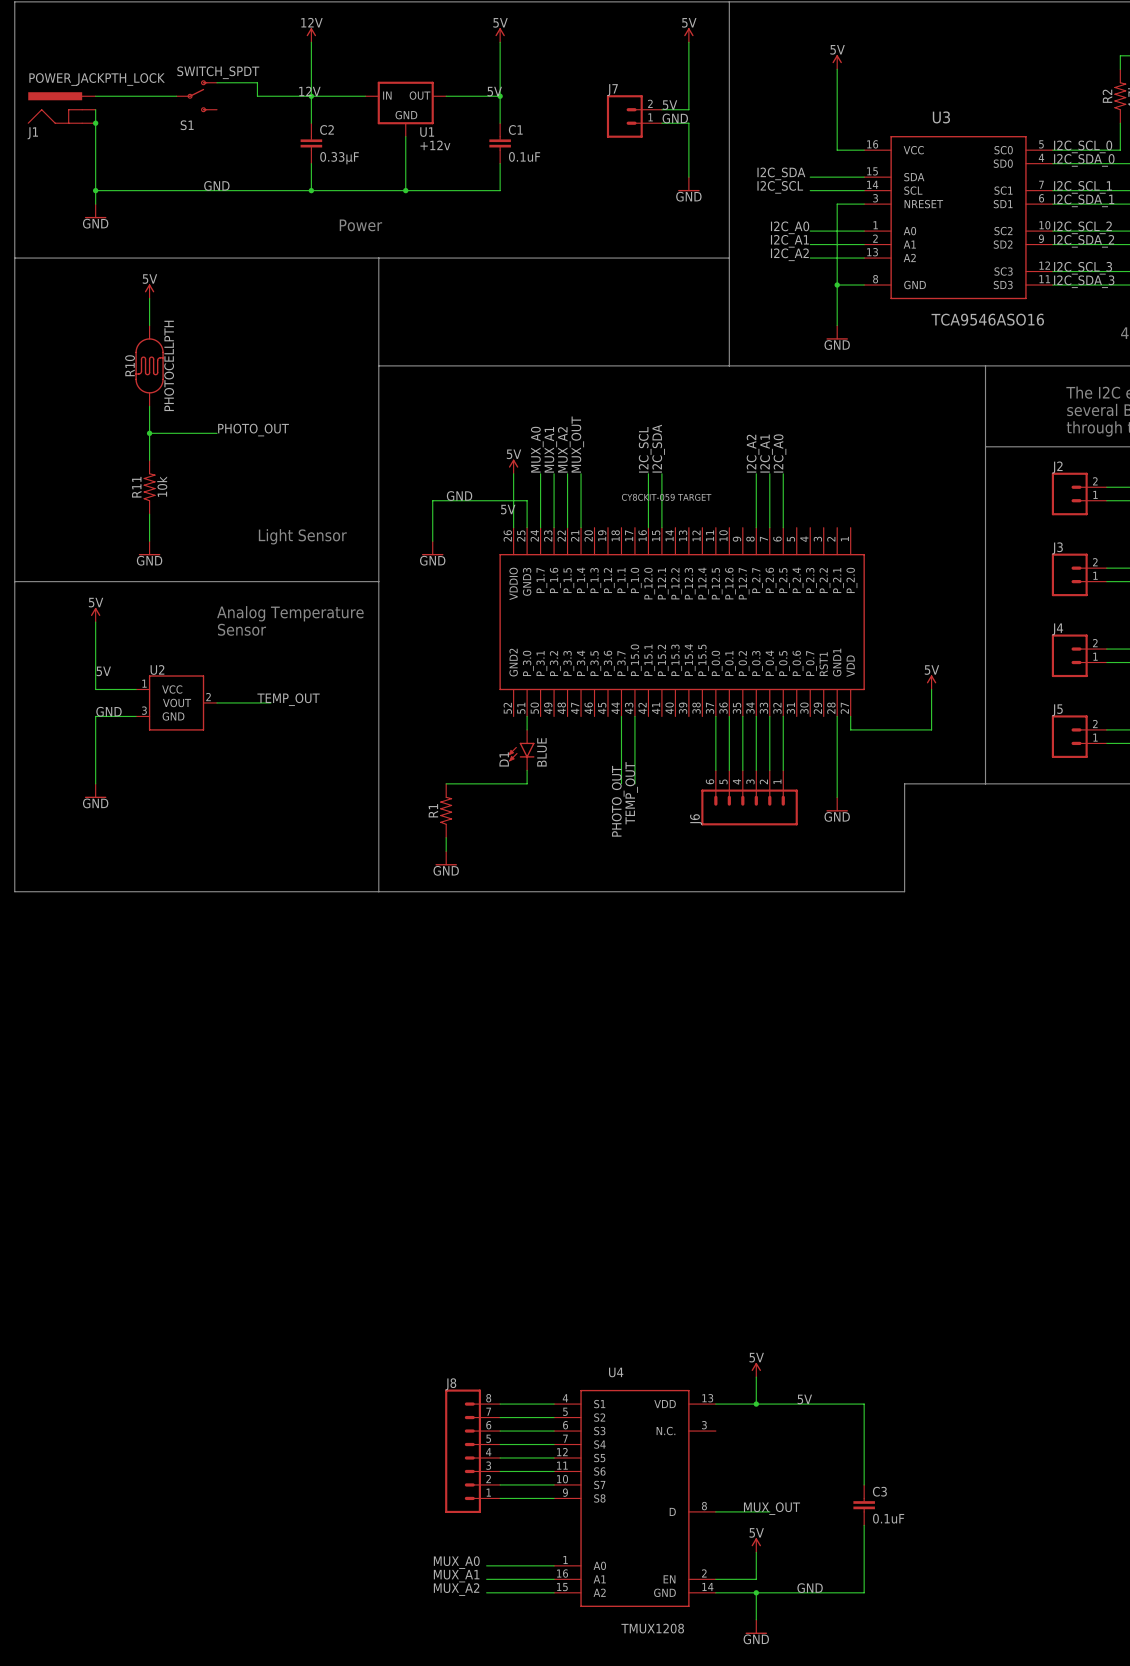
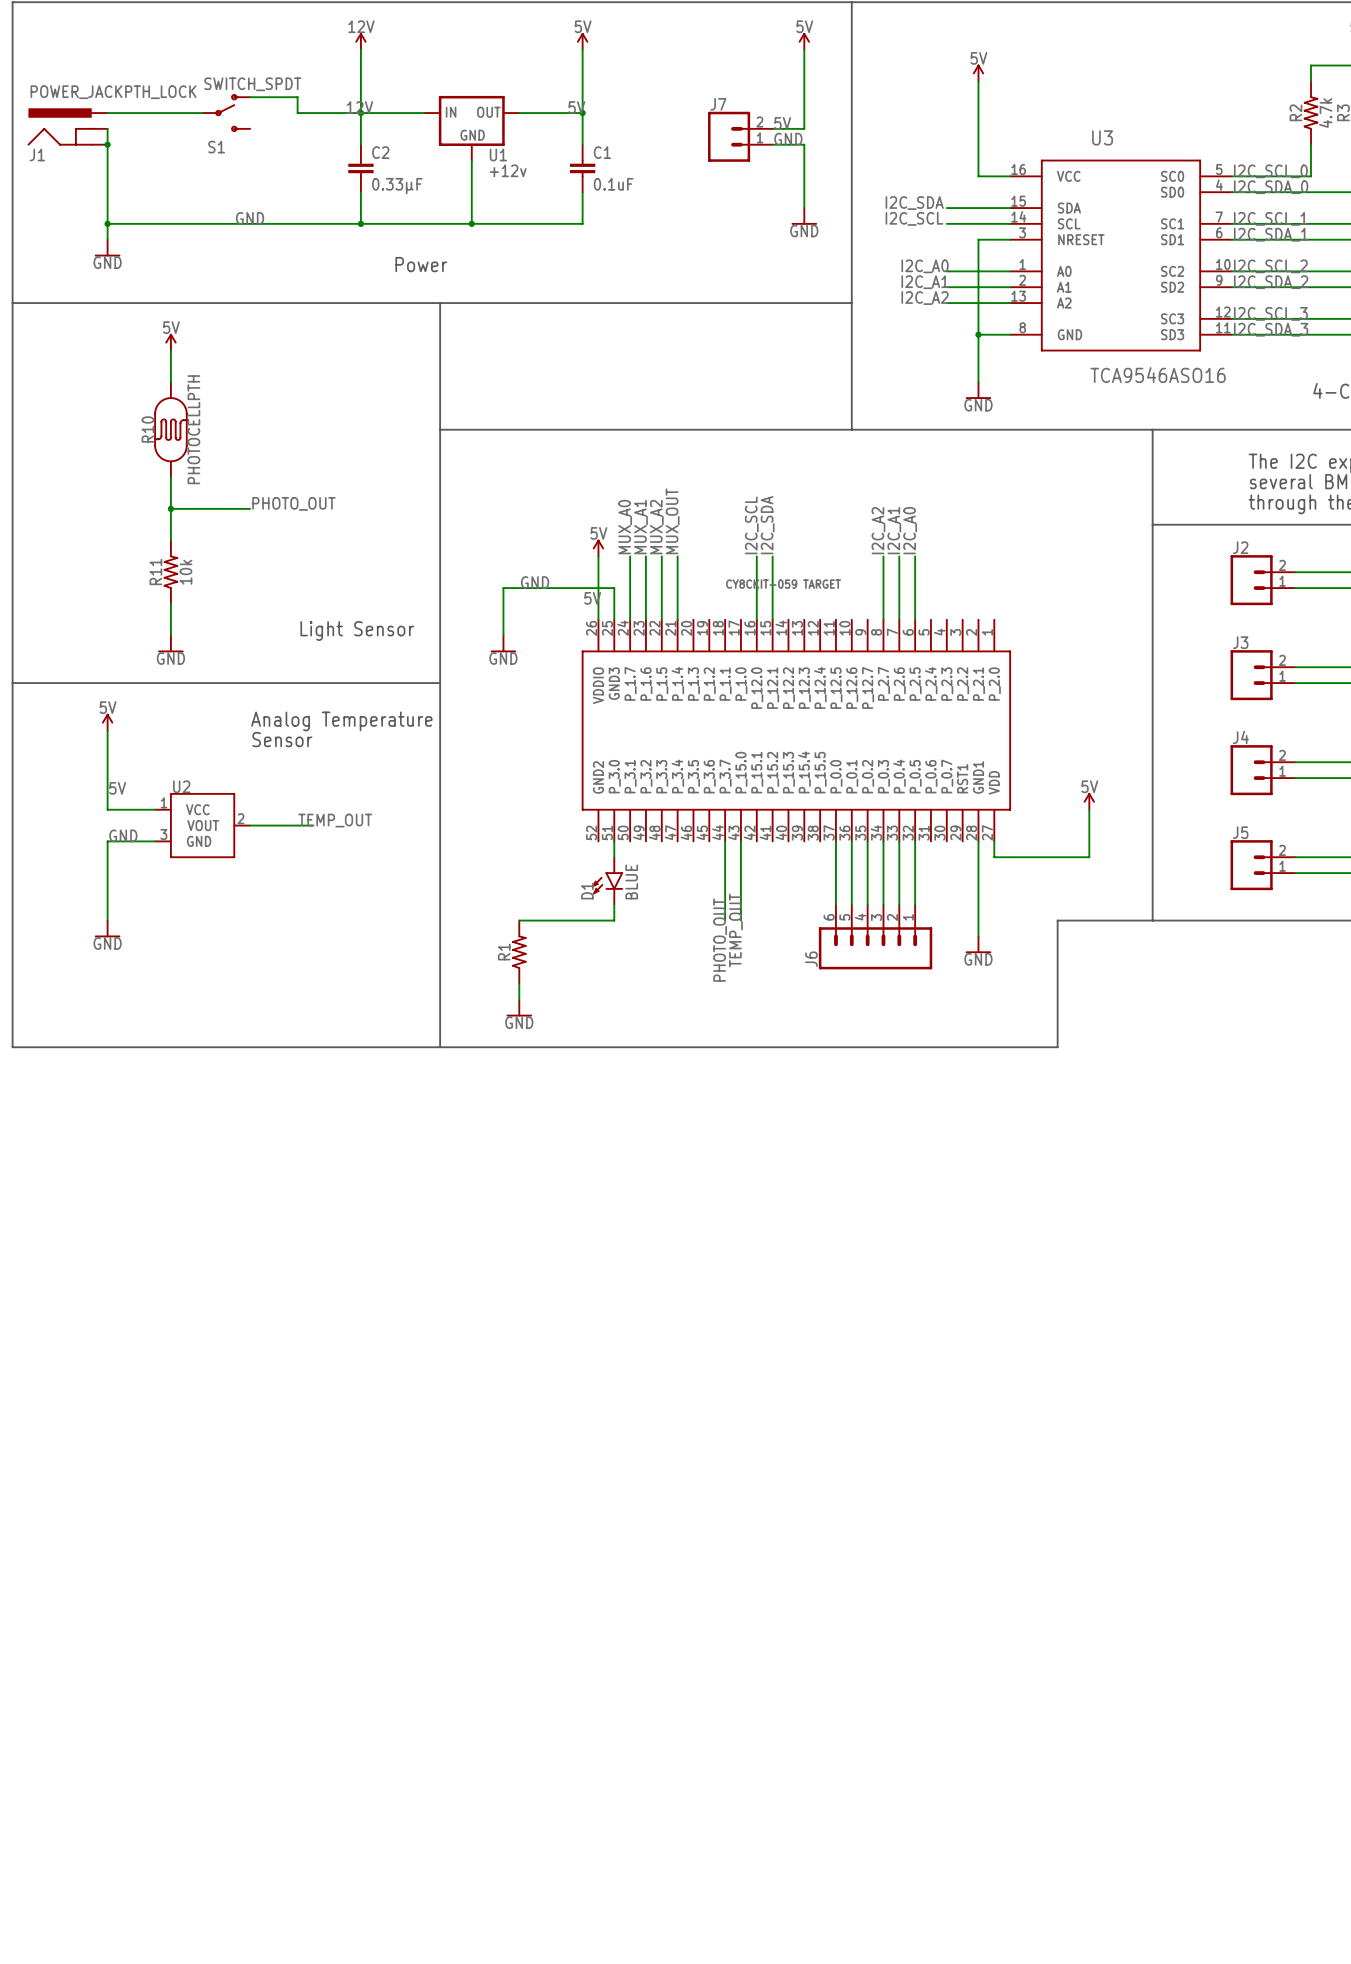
power symbol: 5V (756, 1370) -> none
wire: (756, 1377) (756, 1404) -> none
label: 5V (804, 1399) -> none
wire: (500, 1404) (554, 1404) -> none
wire: (715, 1404) (864, 1404) (864, 1484) -> none
junction: (756, 1404) -> none
wire: (500, 1417) (554, 1417) -> none
wire: (500, 1431) (554, 1431) -> none
wire: (500, 1444) (554, 1444) -> none
J8: (472, 1451) -> none
wire: (500, 1458) (554, 1458) -> none
wire: (500, 1471) (554, 1471) -> none
wire: (500, 1484) (554, 1484) -> none
wire: (500, 1498) (554, 1498) -> none
U4: TMUX1208 (634, 1498) -> none
C3: 0.1uF (864, 1505) -> none
label: MUX_OUT (772, 1508) -> none
wire: (715, 1511) (769, 1511) -> none
wire: (864, 1525) (864, 1592) (715, 1592) -> none
power symbol: 5V (756, 1545) -> none
wire: (756, 1552) (756, 1579) (715, 1579) -> none
label: MUX_A0 (456, 1562) -> none
wire: (486, 1565) (554, 1565) -> none
label: MUX_A1 (456, 1576) -> none
wire: (486, 1579) (554, 1579) -> none
label: GND (810, 1588) -> none
label: MUX_A2 (456, 1589) -> none
wire: (486, 1592) (554, 1592) -> none
wire: (756, 1592) (756, 1619) -> none
junction: (756, 1592) -> none
power symbol: GND (756, 1626) -> none

